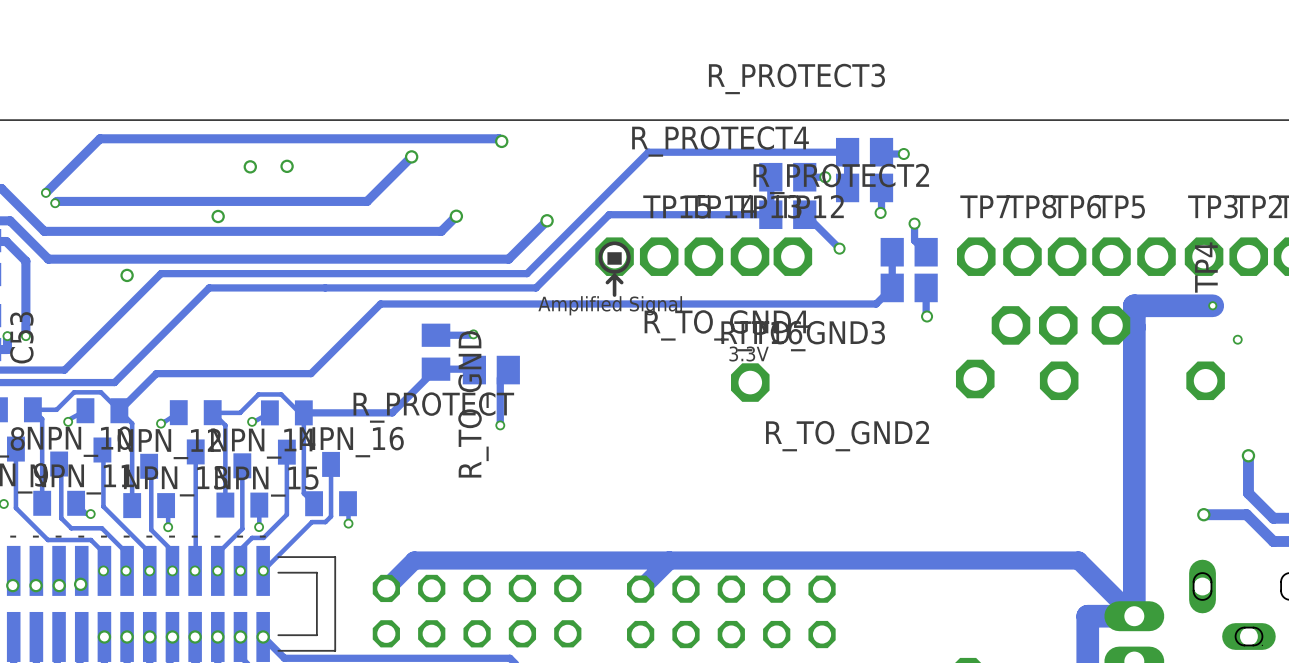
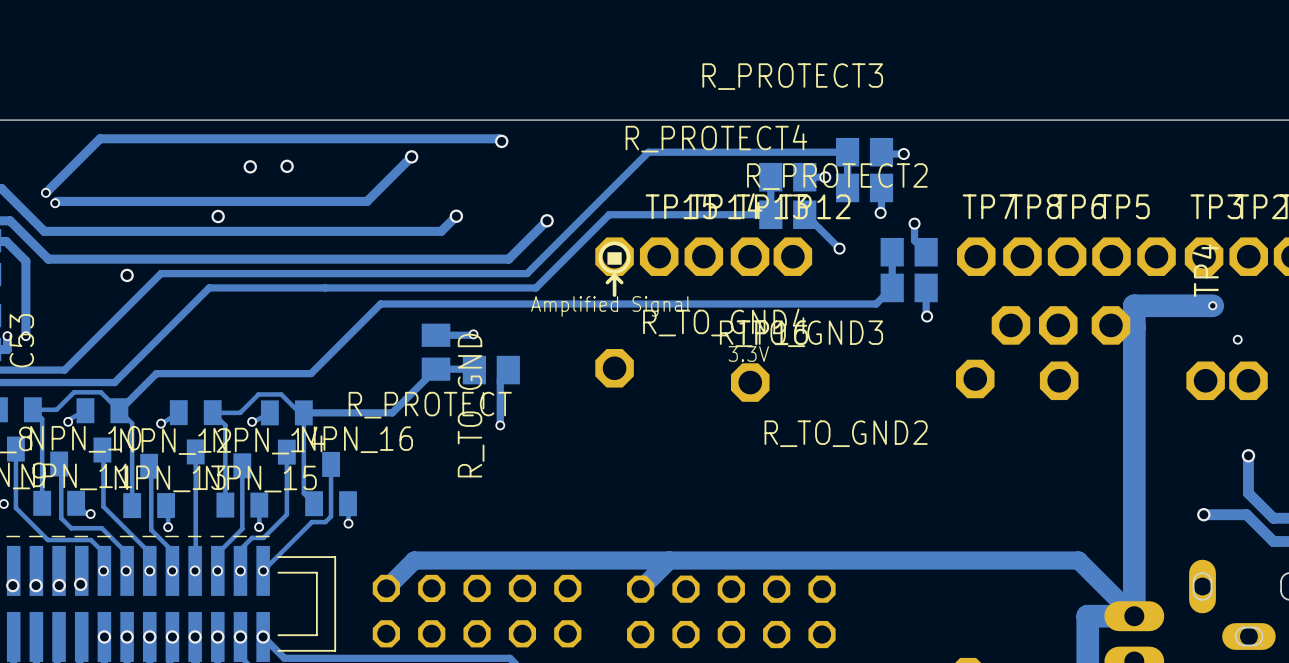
part: none -> (614, 368)
part: none -> (1248, 380)

